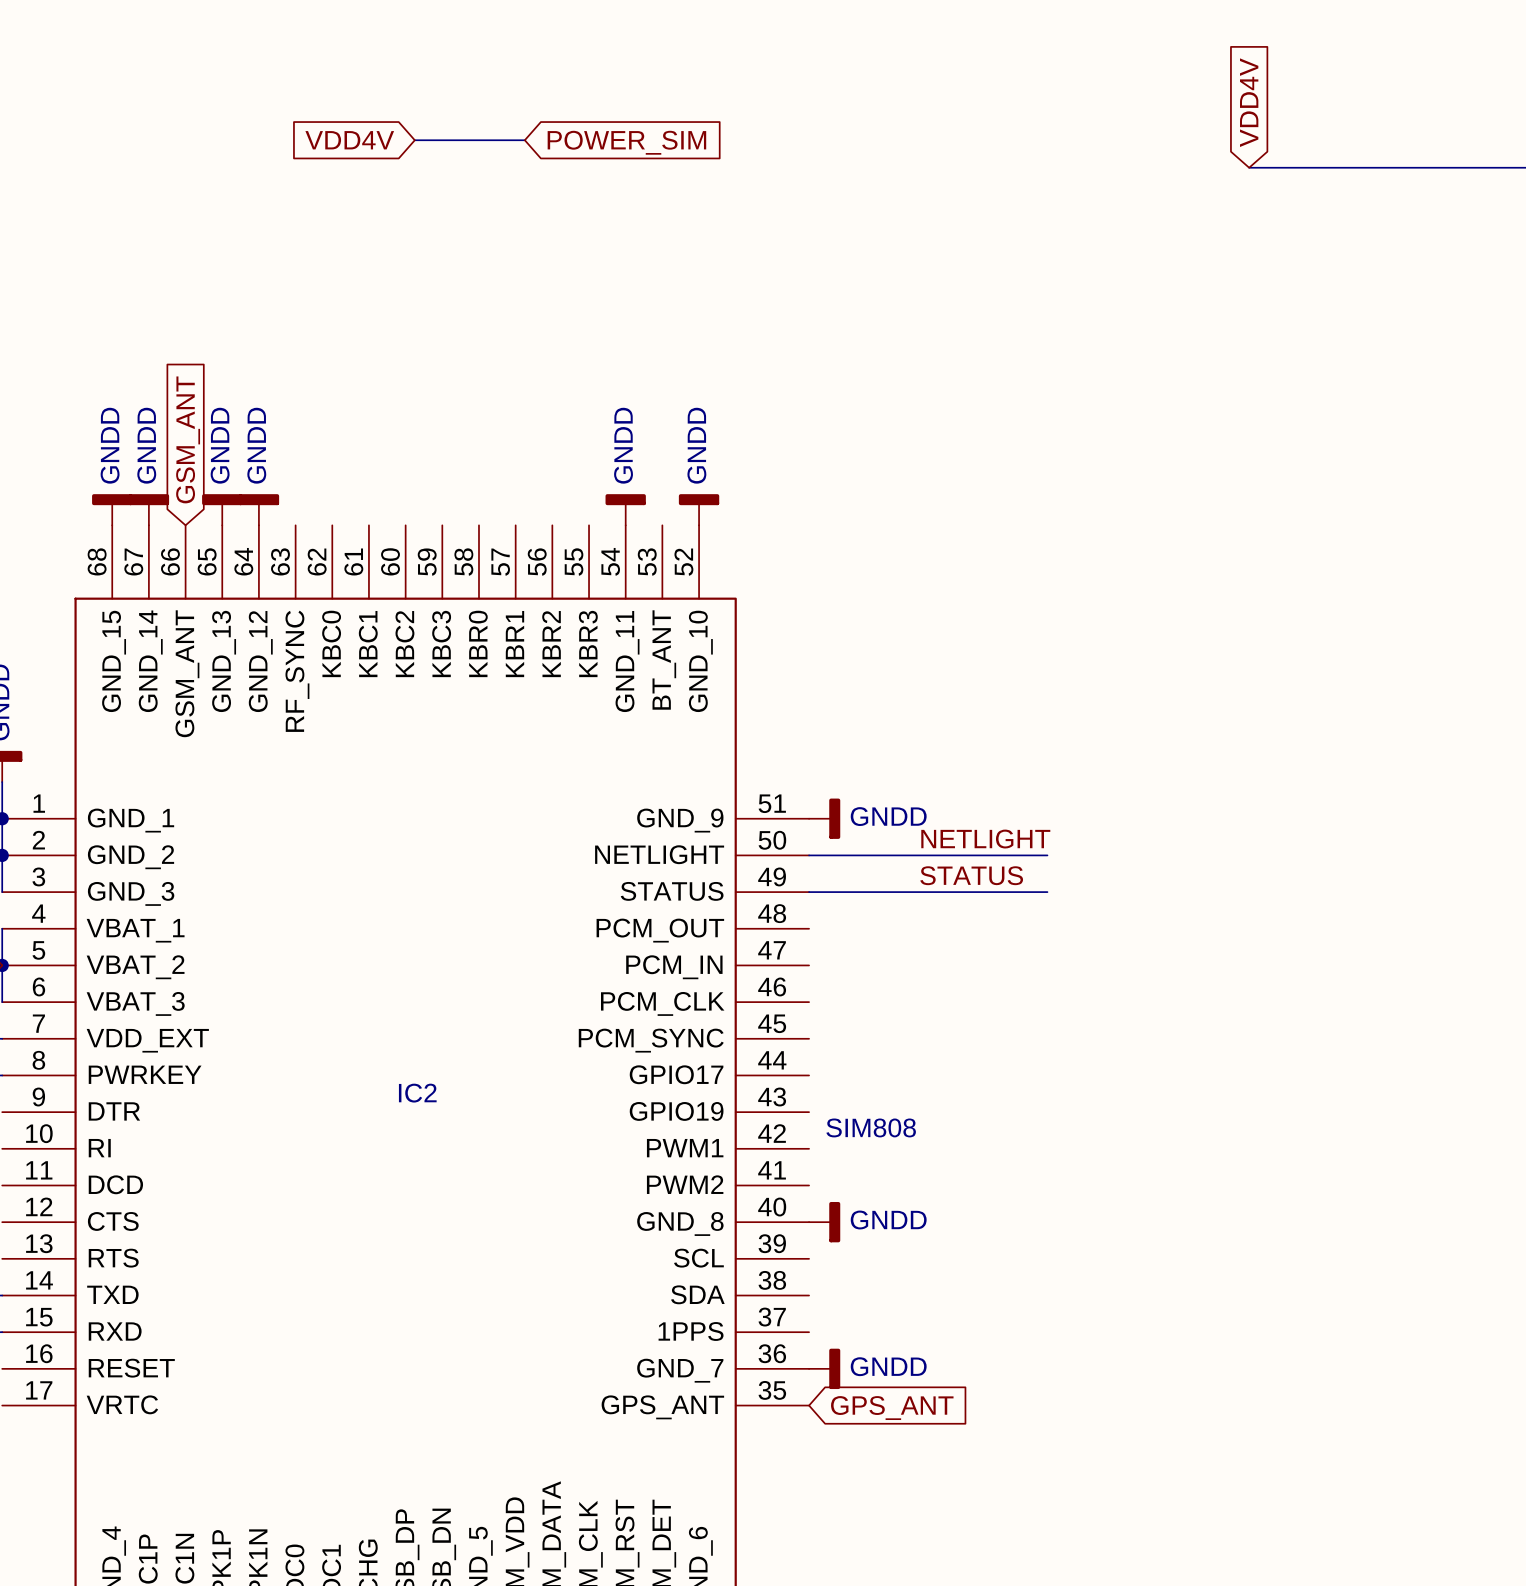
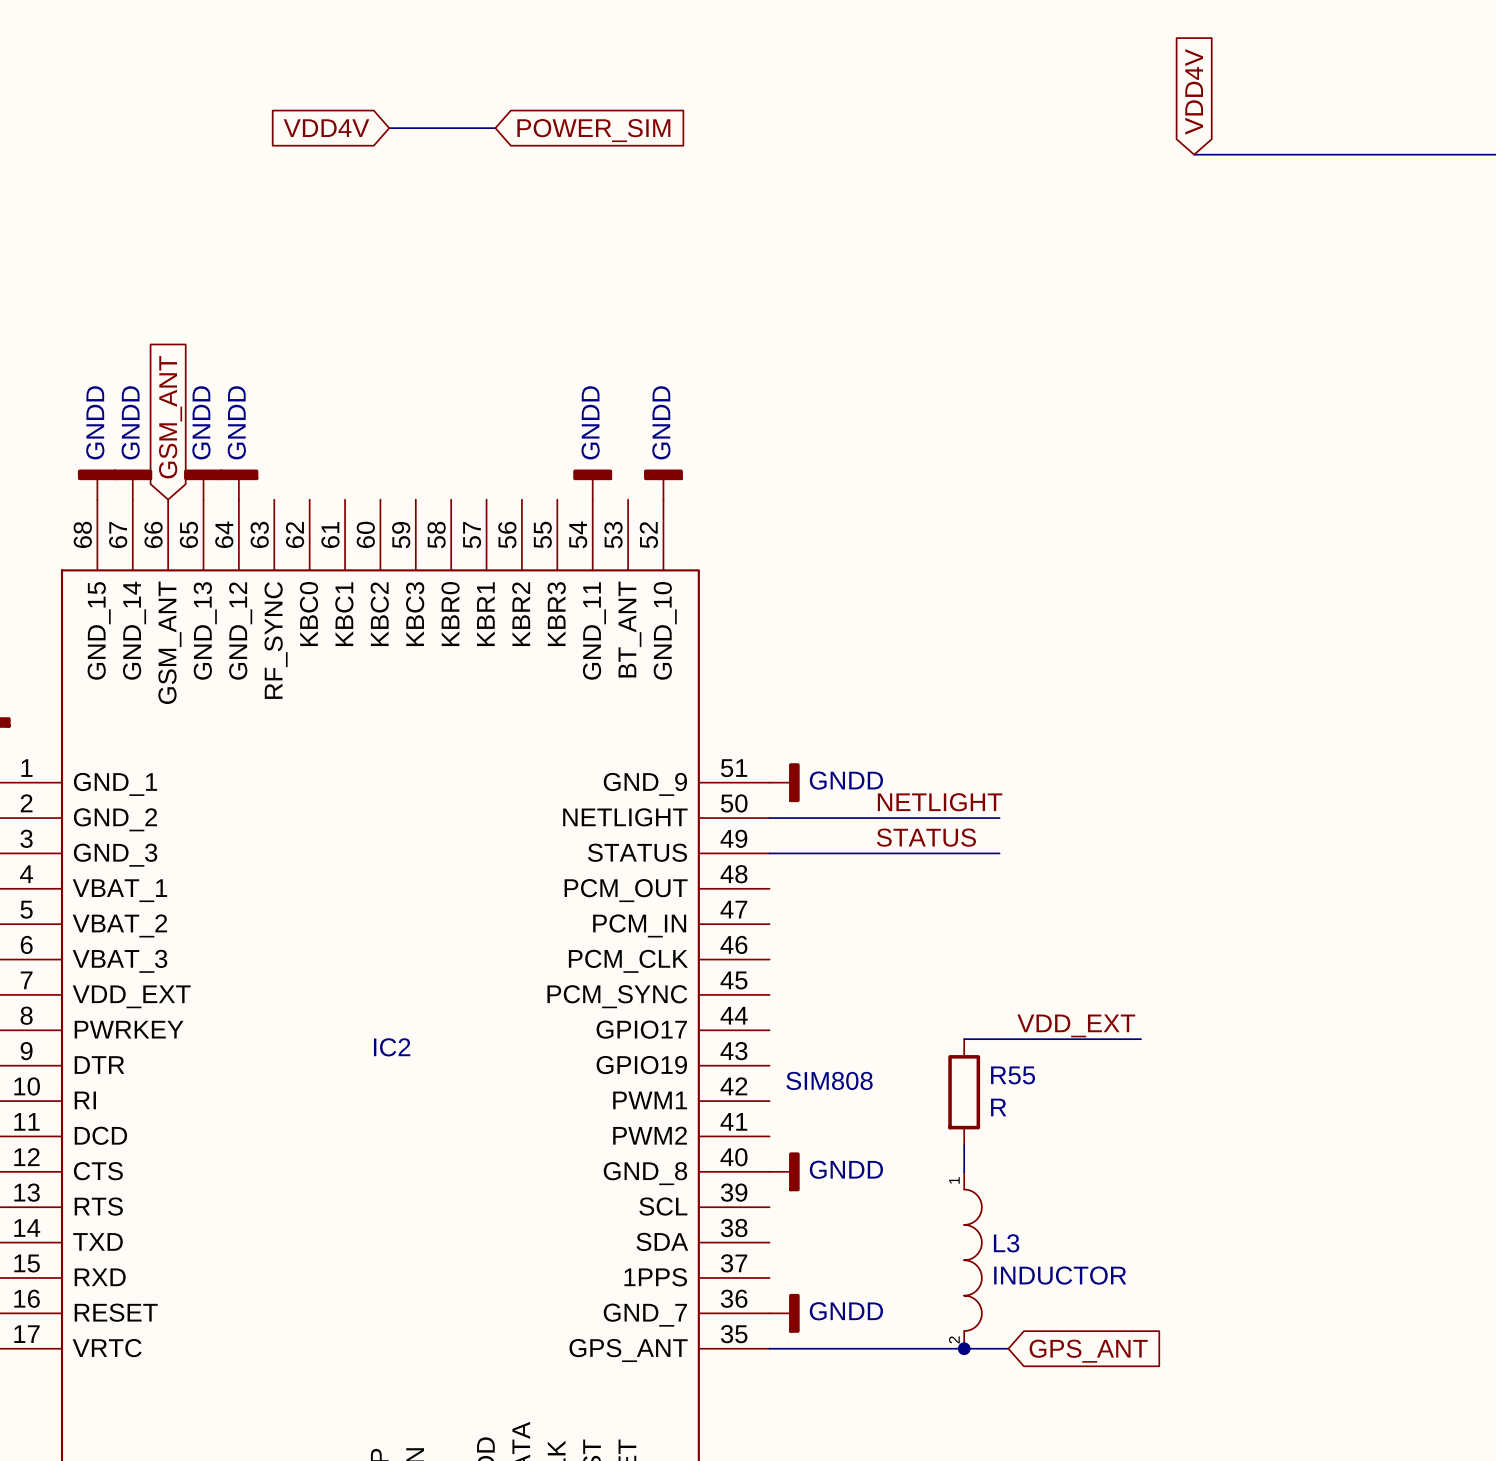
label: none -> VDD_EXT (1076, 1025)
wire: none -> (964, 1039) (1141, 1039)
R55: none -> R (964, 1092)
wire: none -> (964, 1145) (964, 1171)
L3: none -> INDUCTOR (973, 1260)
wire: none -> (769, 1348) (1008, 1348)
junction: none -> (964, 1348)
global label position: GPS_ANT (892, 1408) -> GPS_ANT (1088, 1351)

